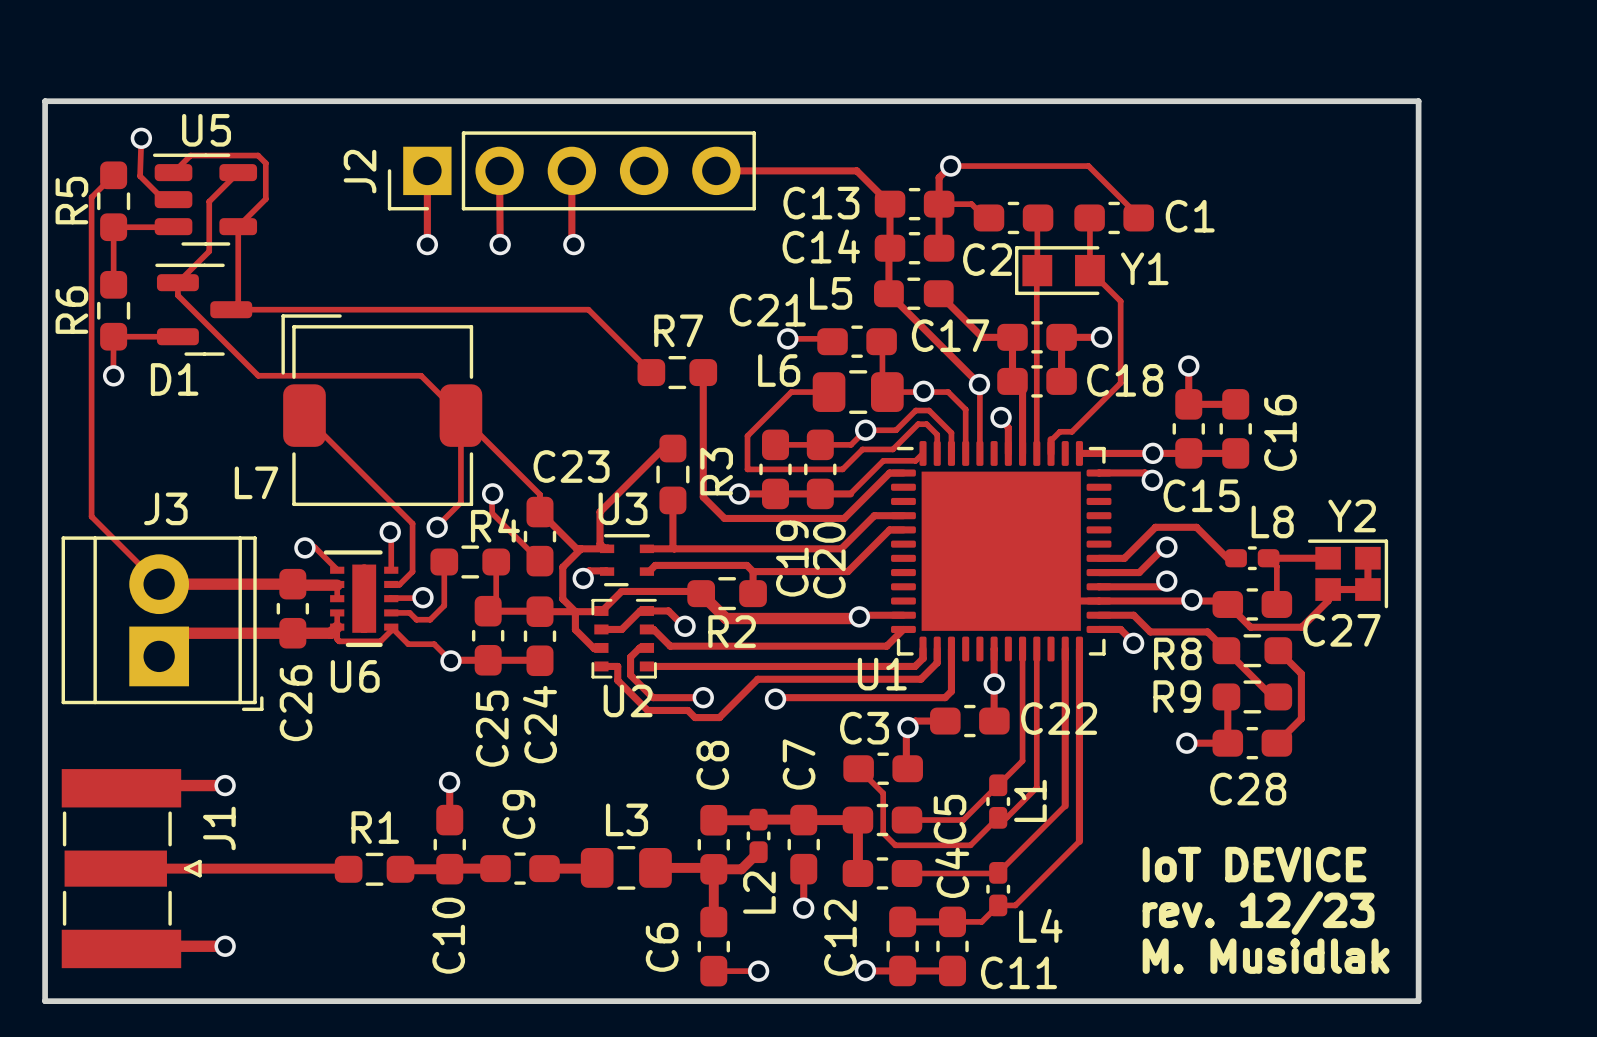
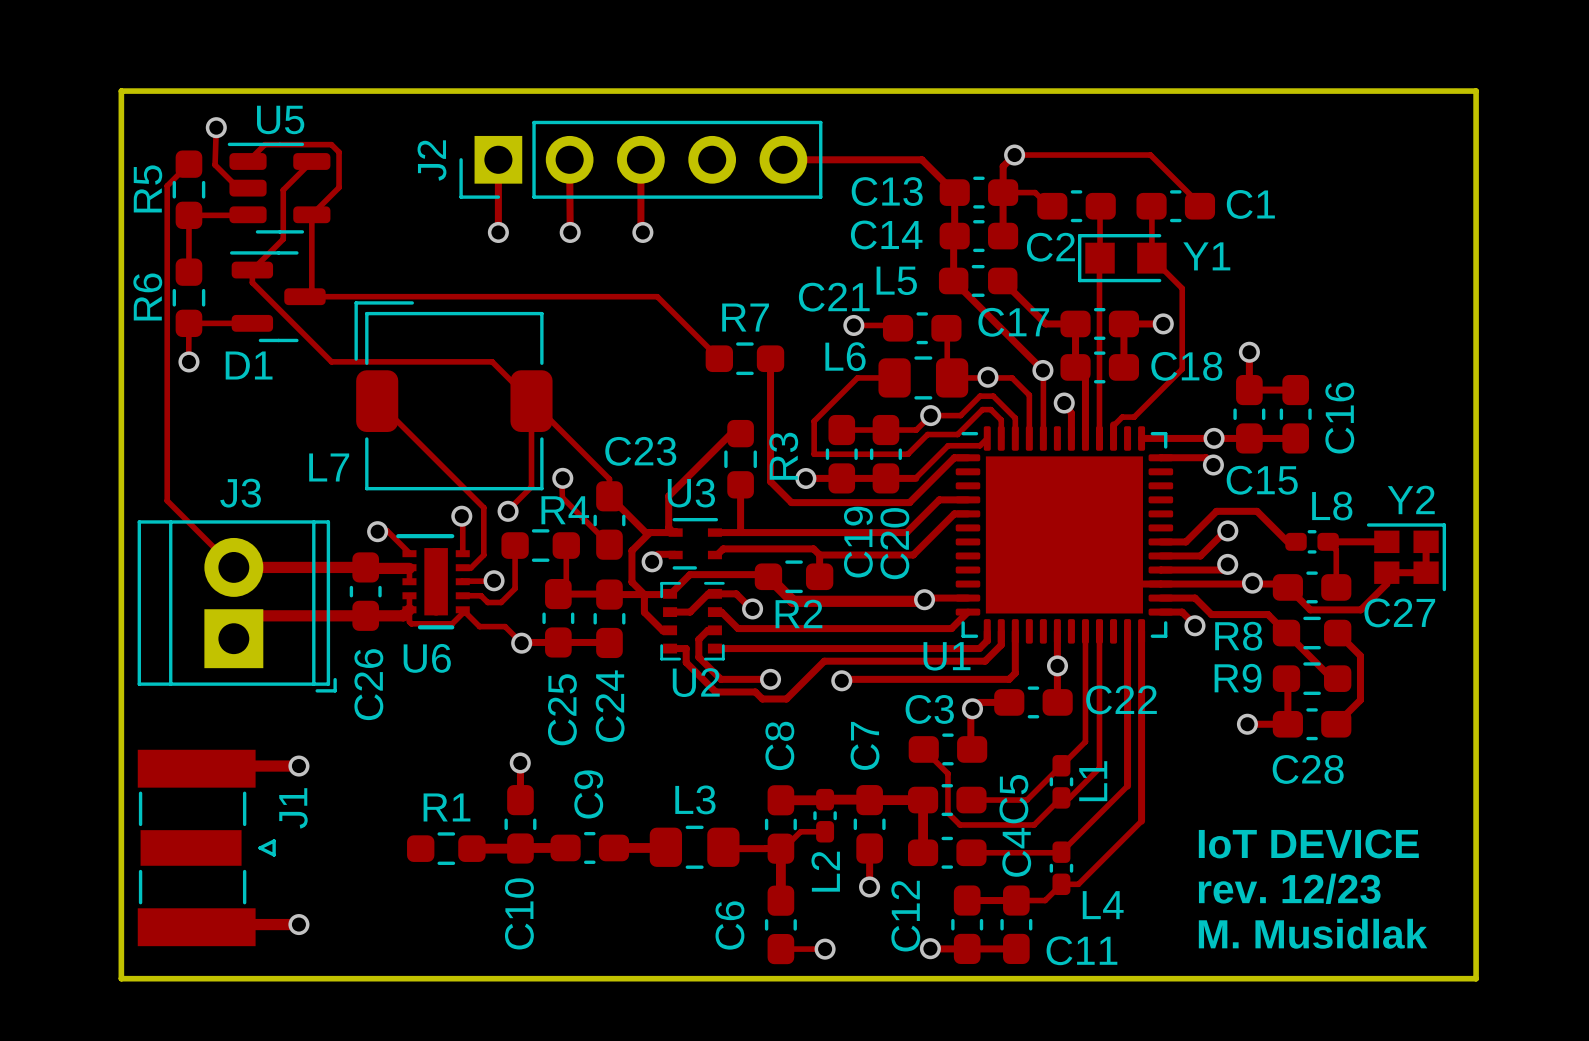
track: (758, 852) (741, 869) (655, 867) -> (825, 831) (800, 831) (782, 850)
track: (348, 865) (348, 869) (116, 869) -> none
track: none -> (716, 848) (766, 848)

